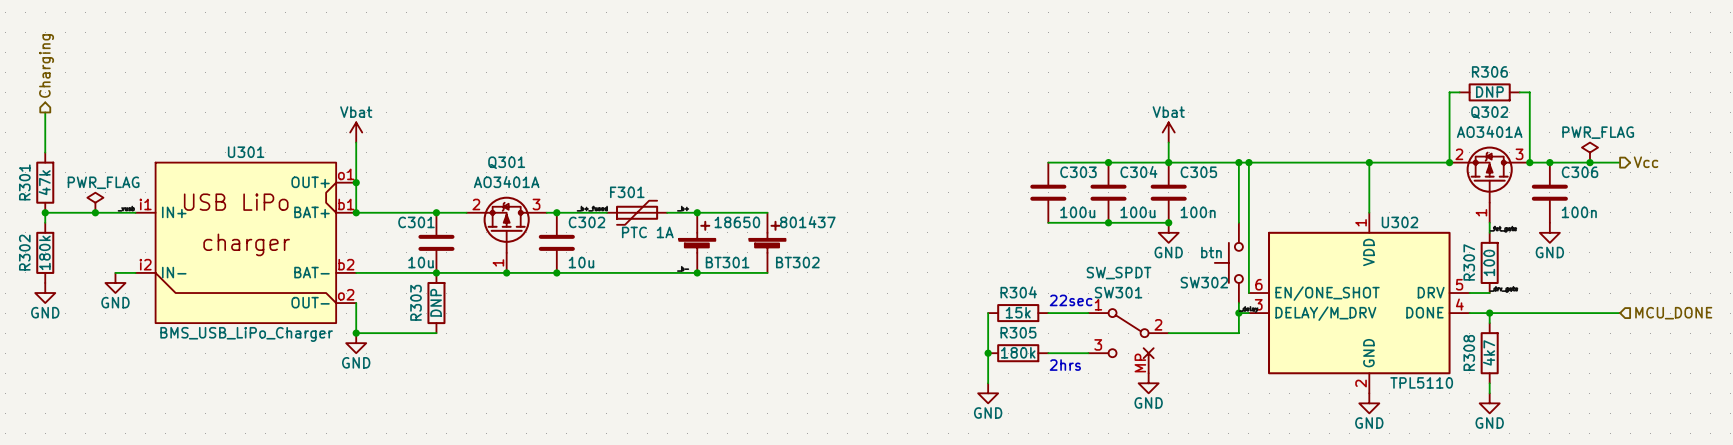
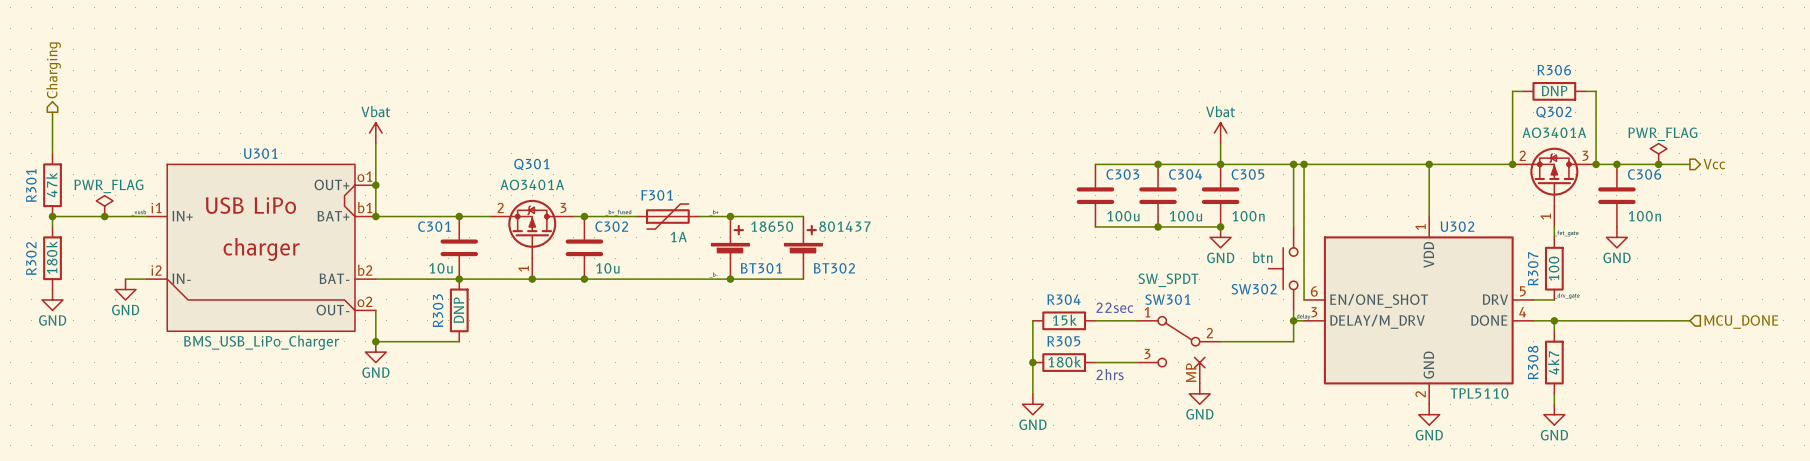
F301 value: PTC 1A (647, 232) -> 1A (678, 237)

